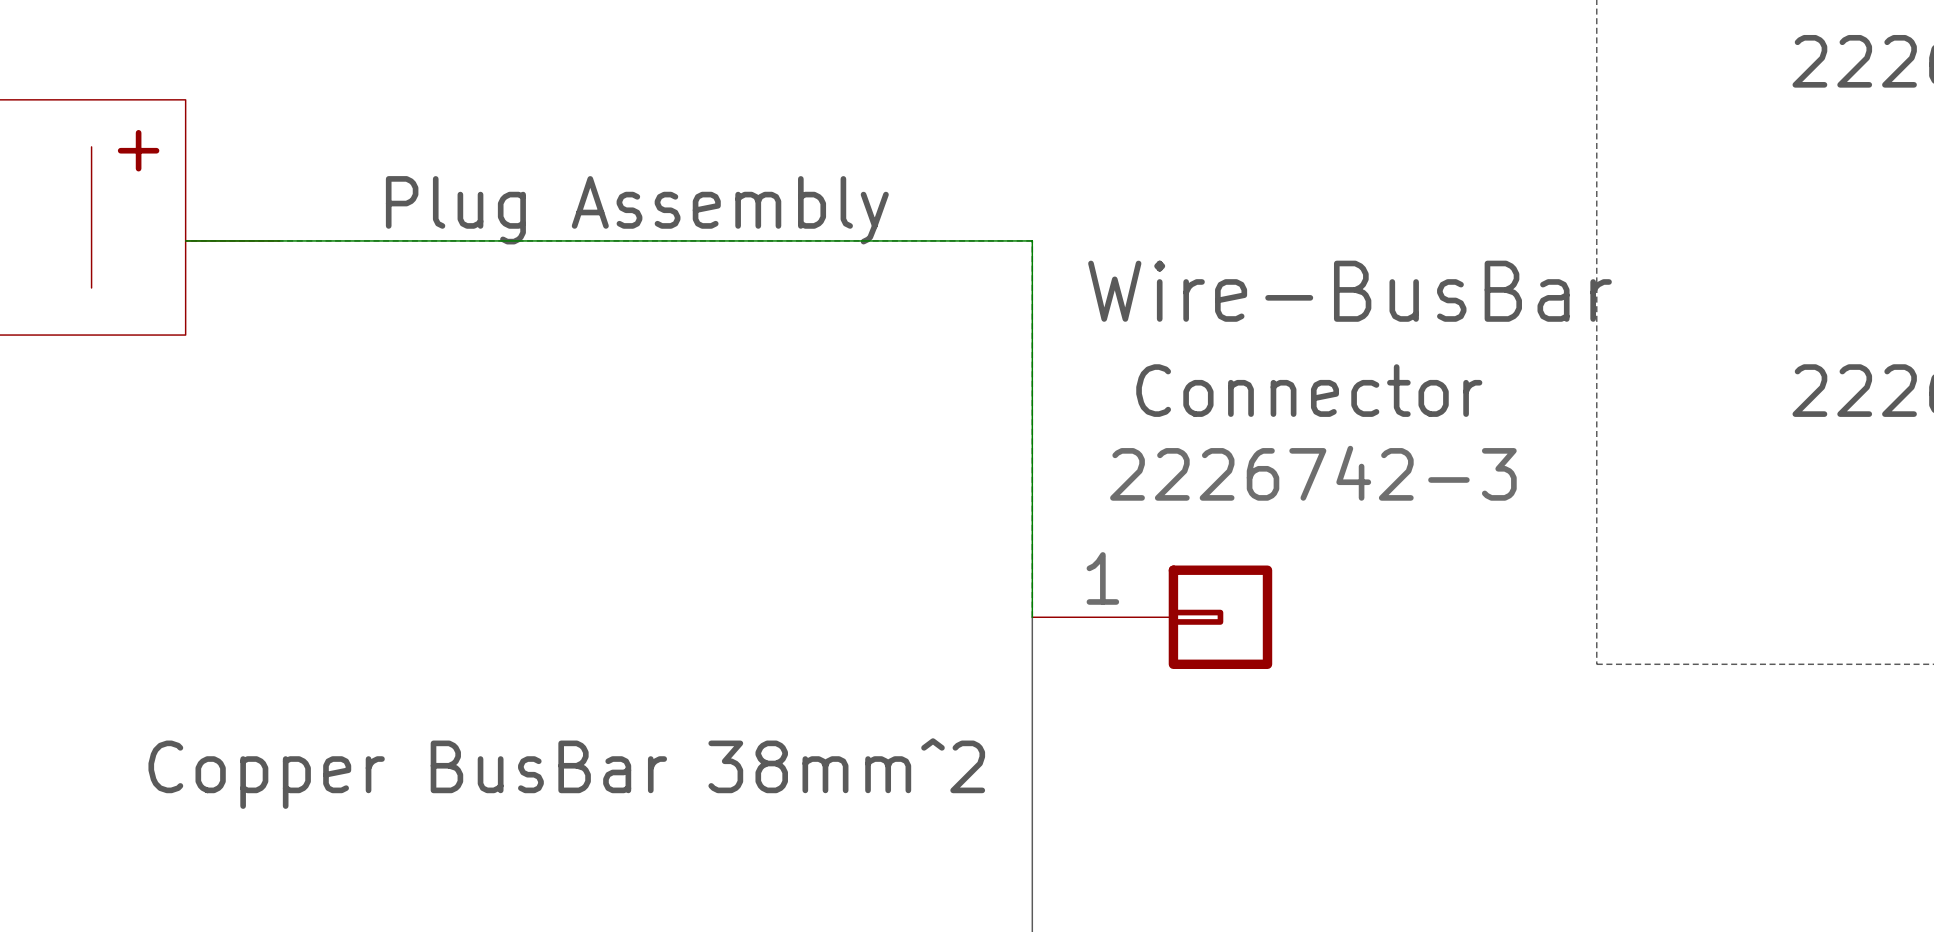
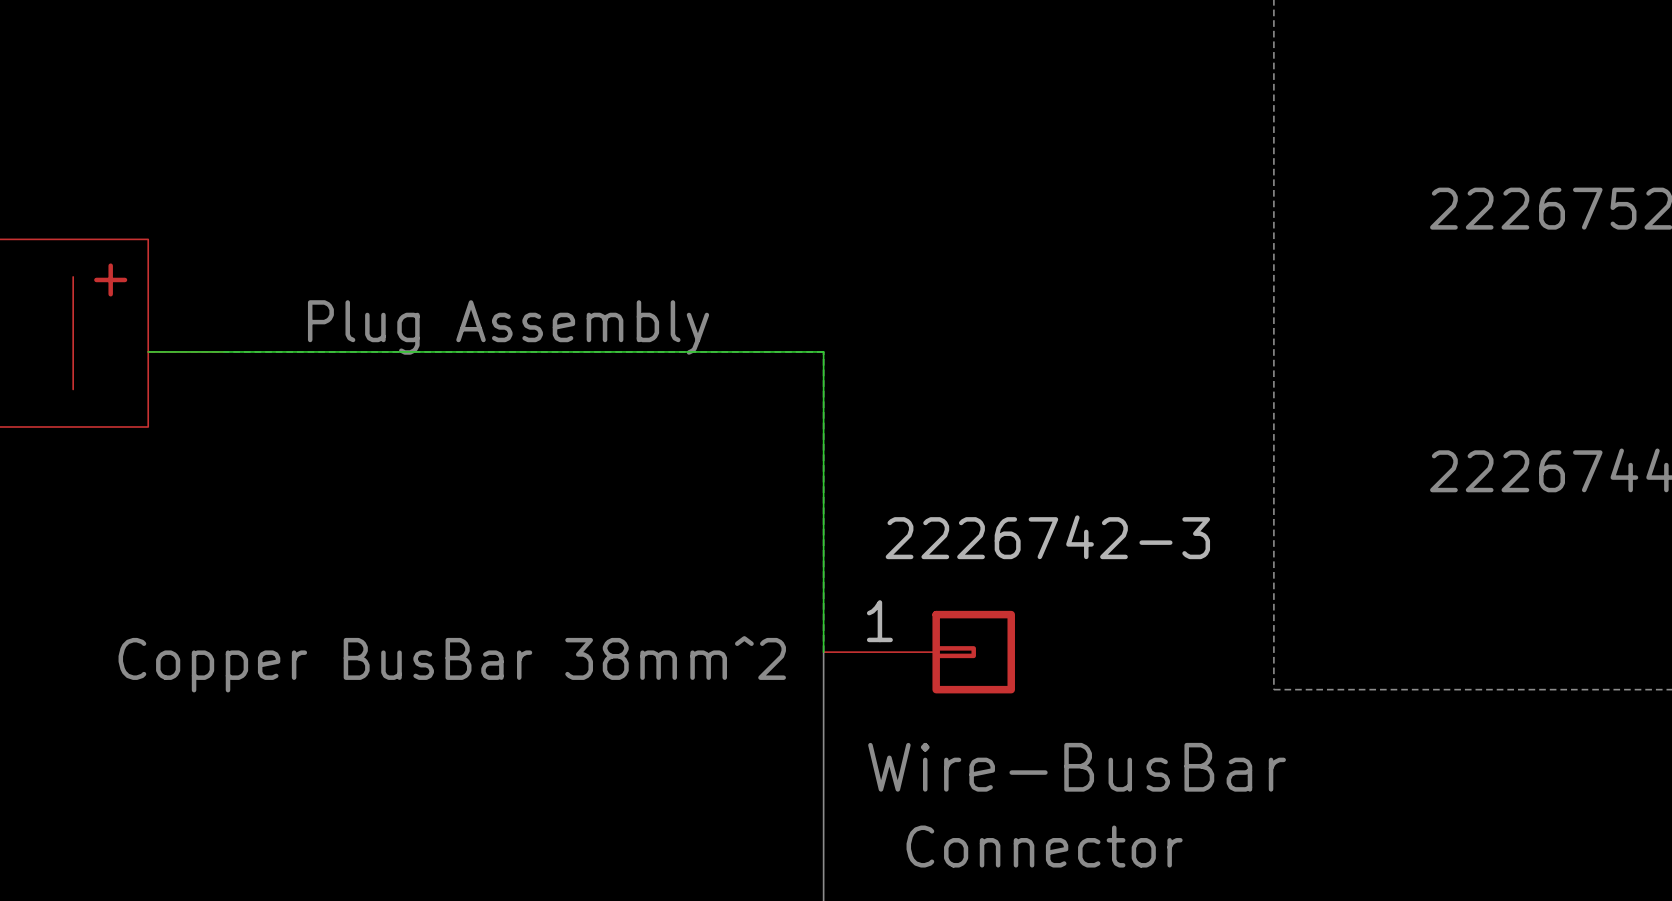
text position: Wire-BusBar (1350, 291) -> Wire-BusBar (1077, 767)
text position: Connector (1309, 390) -> Connector (1044, 846)
text position: Copper BusBar 38mm^2 (566, 773) -> Copper BusBar 38mm^2 (452, 664)

